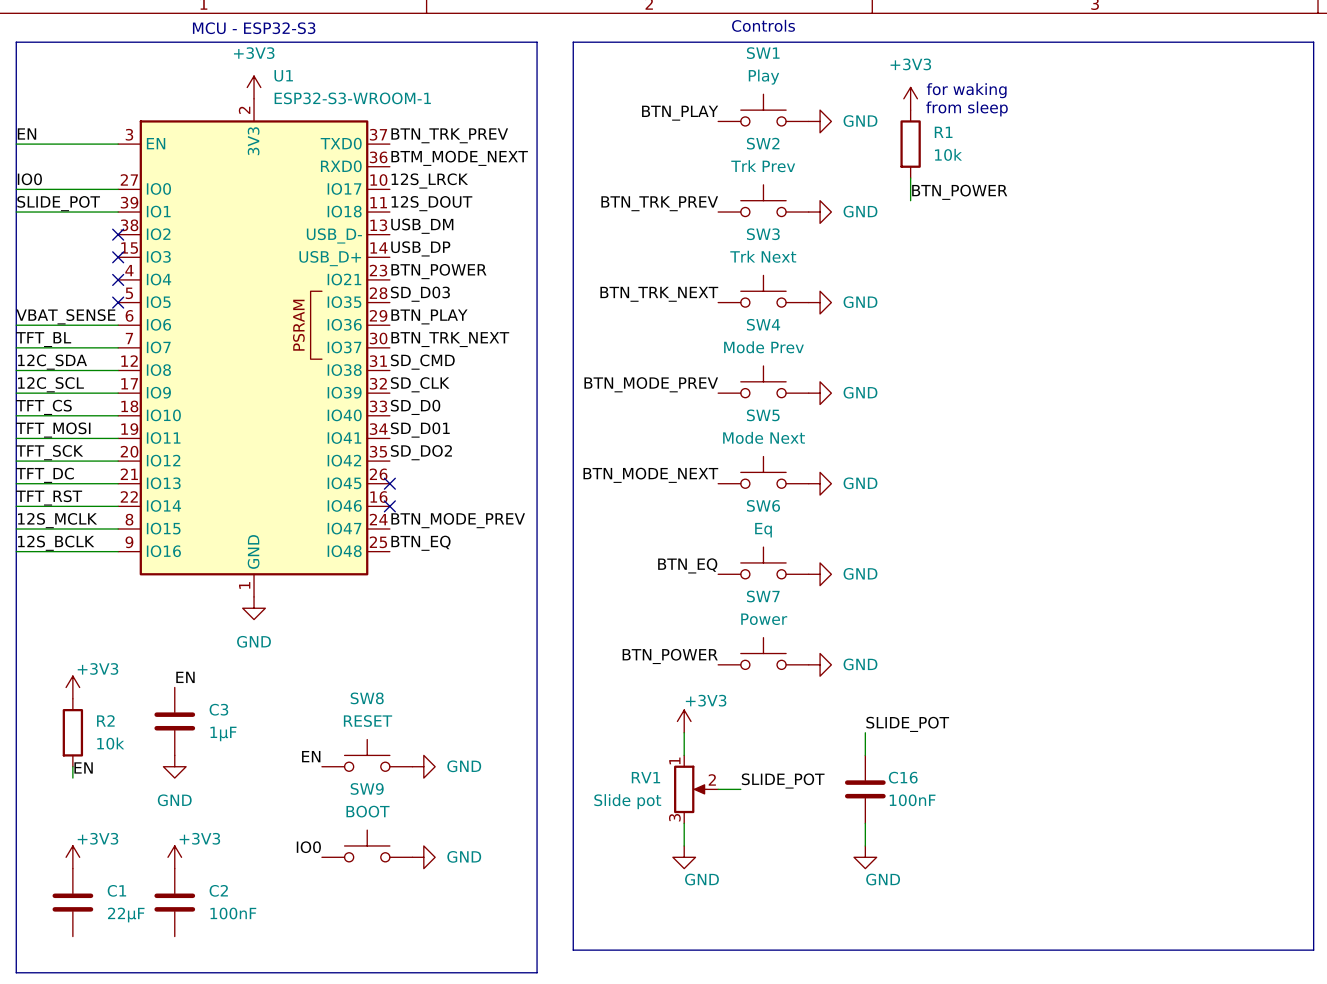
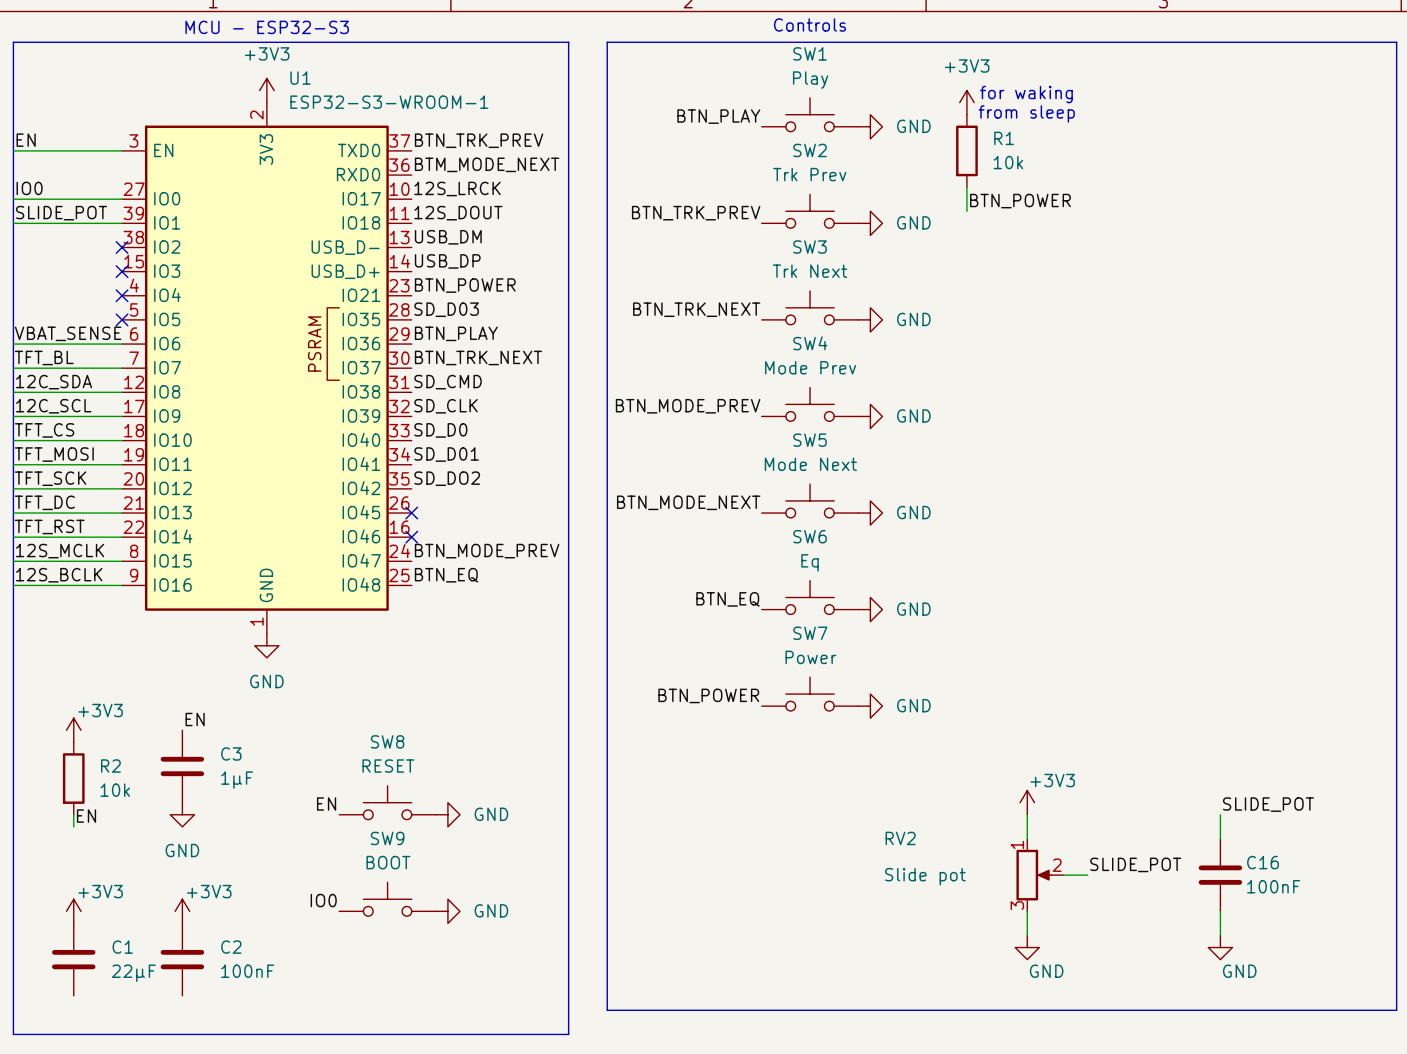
power symbol: +3V3 (684, 721) -> none
label: SLIDE_POT (907, 724) -> none
wire: (684, 732) (684, 755) -> none
wire: (865, 732) (865, 755) -> (1027, 814) (1027, 838)
power symbol: none -> +3V3 (1027, 802)
label: none -> SLIDE_POT (1268, 804)
wire: none -> (1220, 814) (1220, 838)
label: SLIDE_POT (783, 781) -> none
RV1: Slide pot (696, 789) -> none
wire: (718, 789) (740, 789) -> none
C16 position: (865, 789) -> (1220, 875)
label: none -> SLIDE_POT (1135, 864)
wire: (684, 823) (684, 845) -> none
wire: (865, 823) (865, 845) -> (1027, 911) (1027, 935)
RV2: none -> Slide pot (1039, 875)
wire: none -> (1063, 875) (1087, 875)
power symbol: GND (684, 857) -> none
power symbol position: GND (865, 857) -> GND (1027, 947)
wire: none -> (1220, 911) (1220, 935)
power symbol: none -> GND (1220, 947)

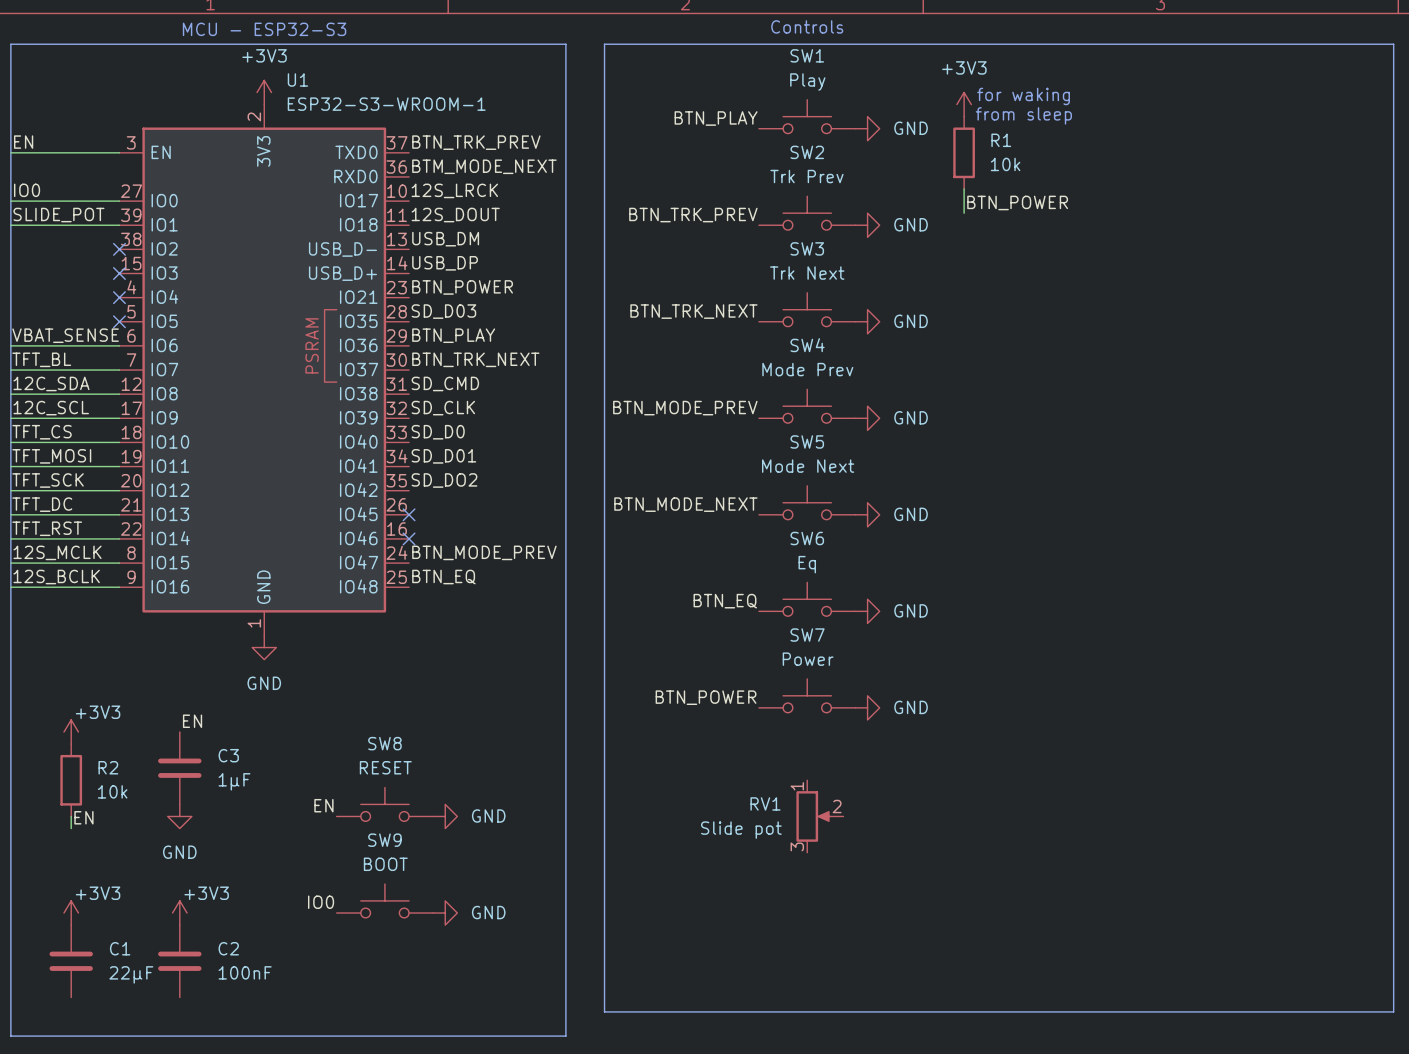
power symbol: +3V3 (1027, 802) -> none
label: SLIDE_POT (1268, 804) -> none
RV1: none -> Slide pot (819, 816)
wire: (1027, 814) (1027, 838) -> none
wire: (1220, 814) (1220, 838) -> none
label: SLIDE_POT (1135, 864) -> none
RV2: Slide pot (1039, 875) -> none
wire: (1063, 875) (1087, 875) -> none
C16: 100nF (1220, 875) -> none
wire: (1027, 911) (1027, 935) -> none
wire: (1220, 911) (1220, 935) -> none
power symbol: GND (1027, 947) -> none
power symbol: GND (1220, 947) -> none

